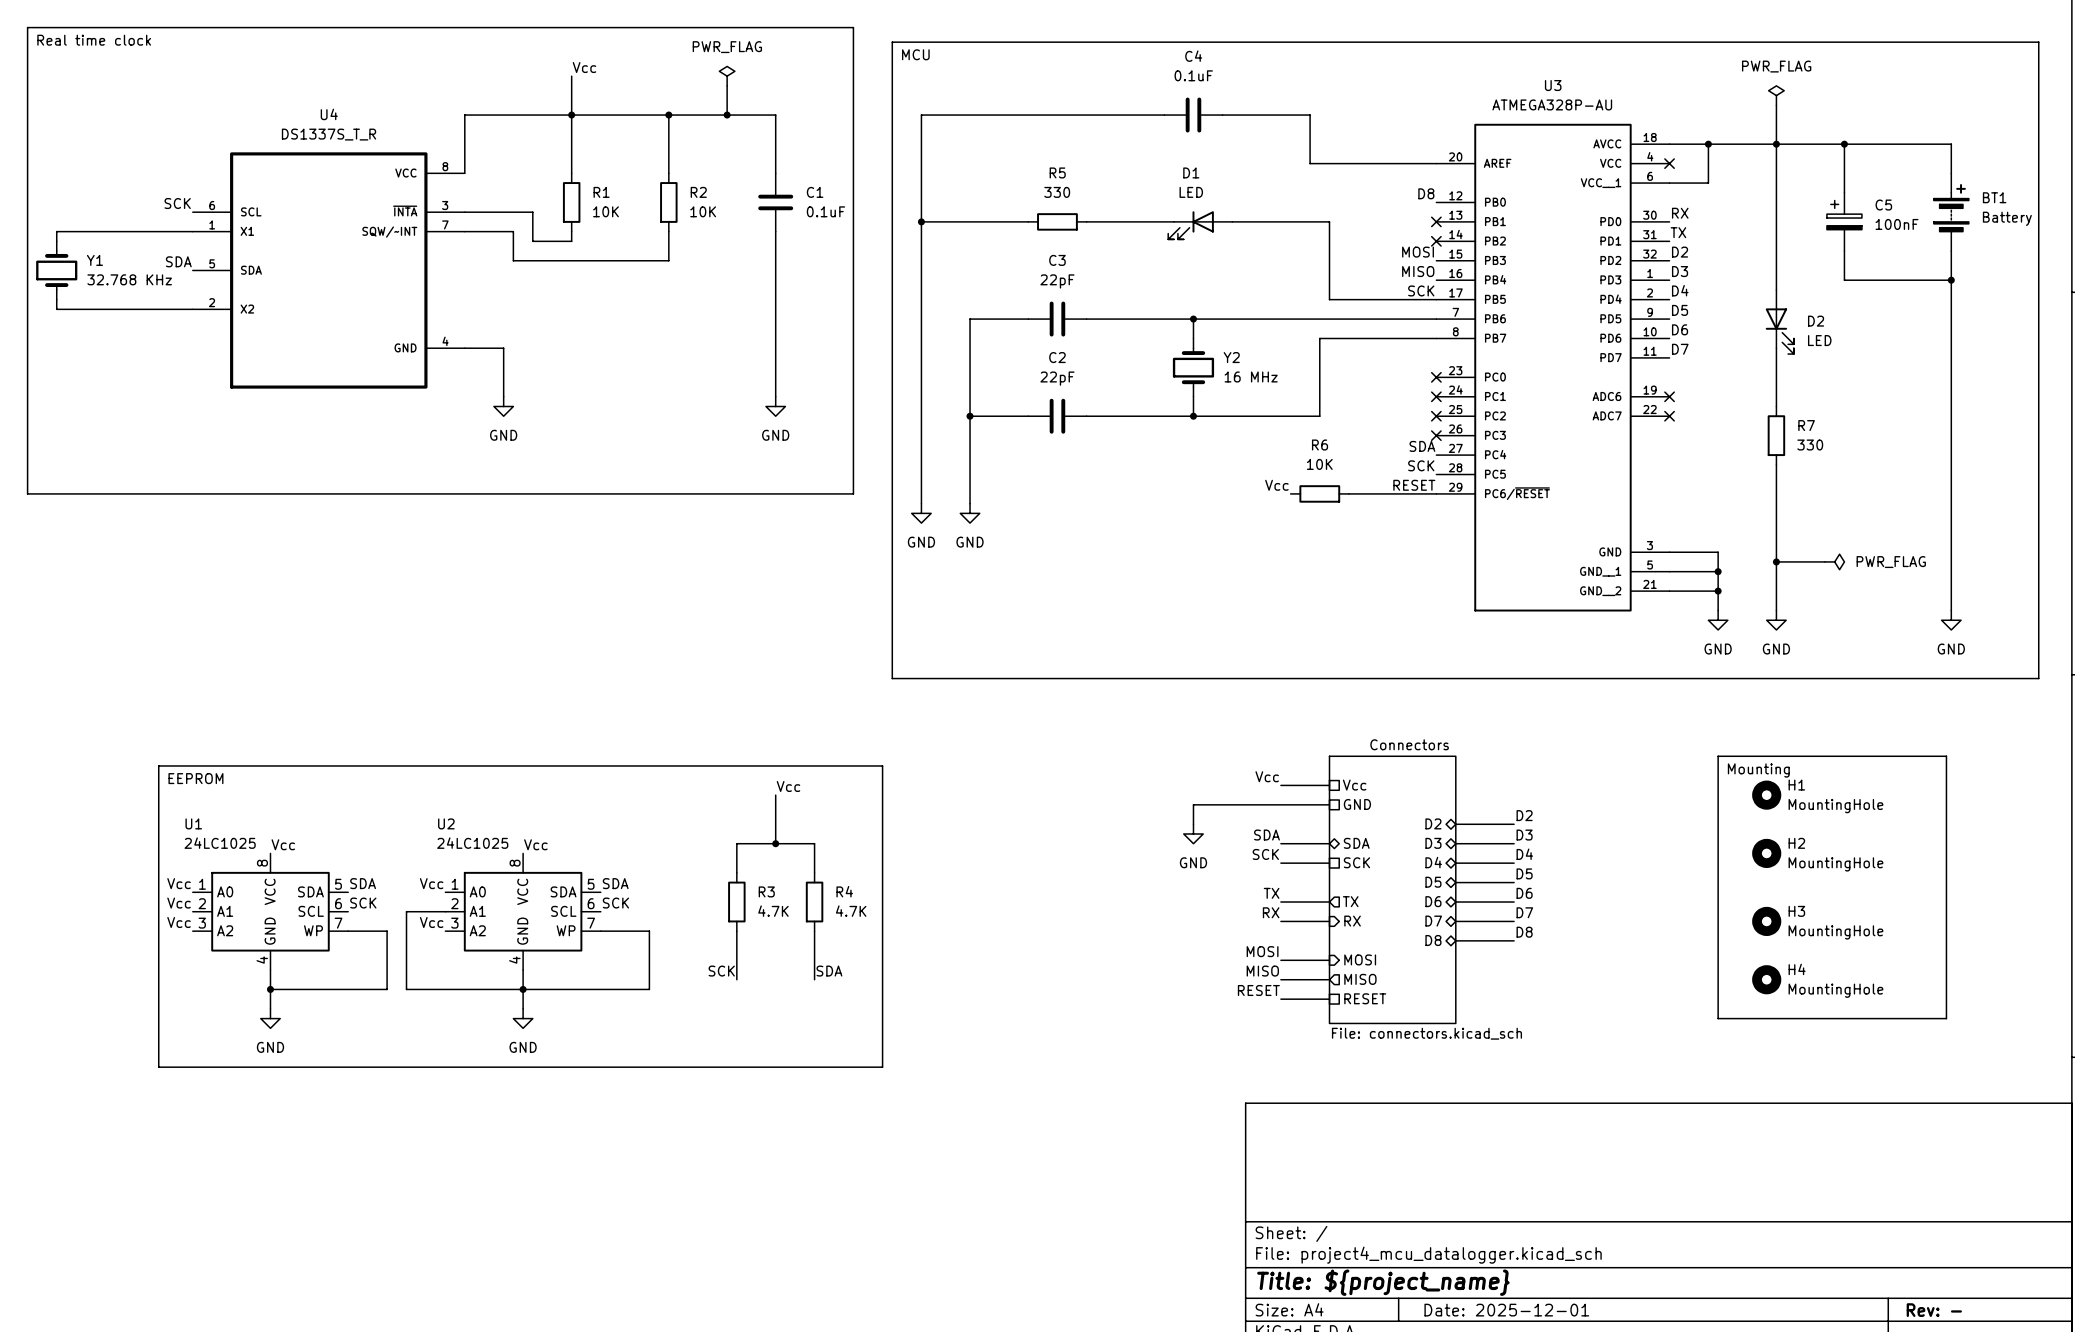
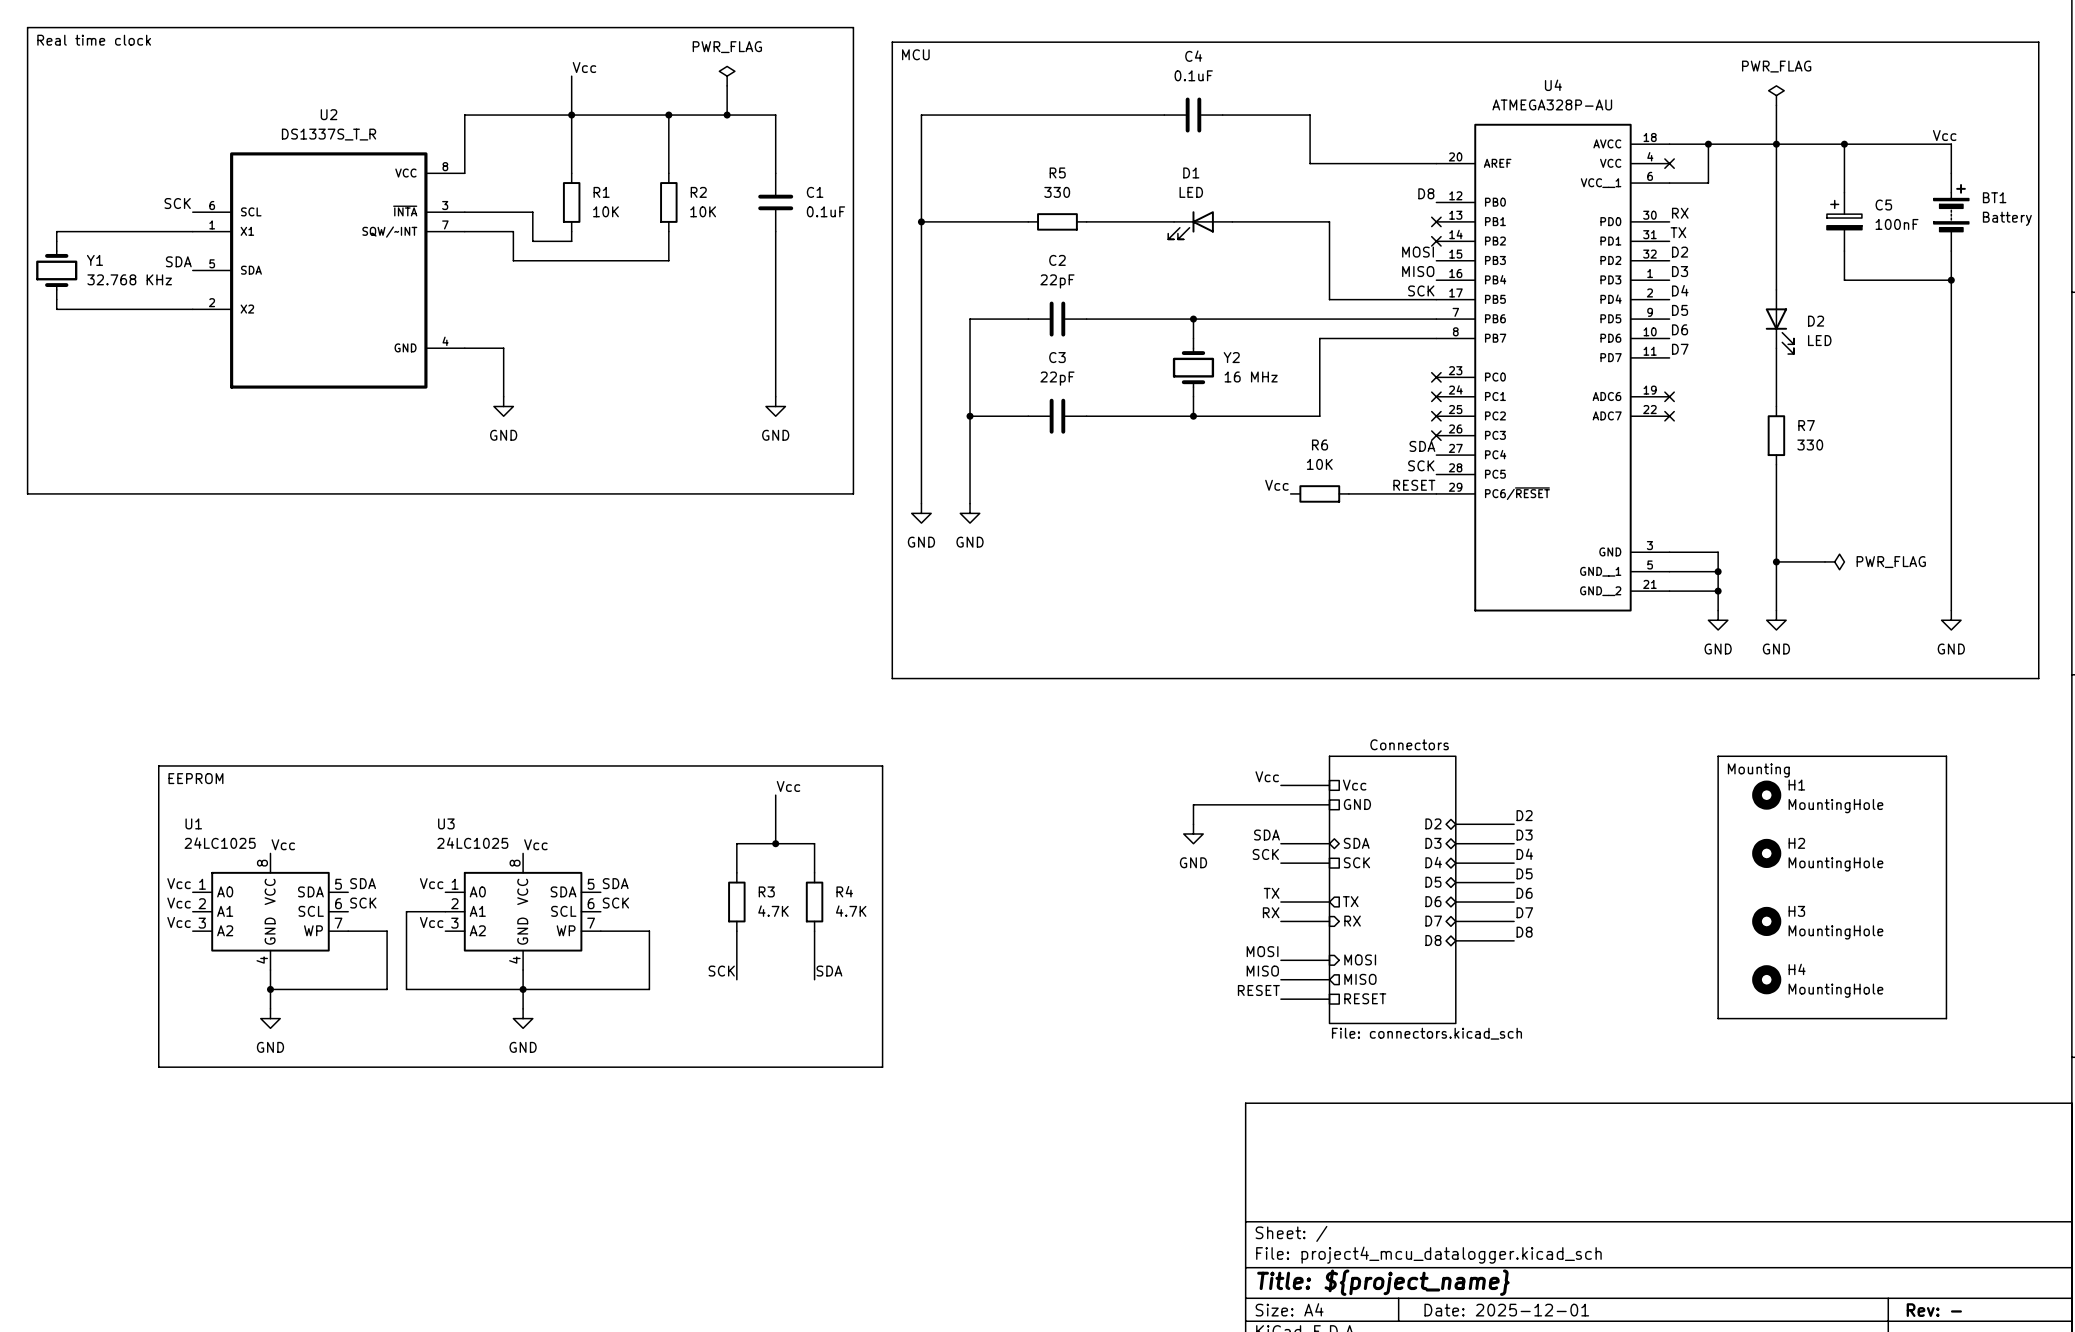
U3 name: U3 (1553, 85) -> U4 (1553, 85)
U4 name: U4 (329, 114) -> U2 (329, 114)
label: none -> Vcc (1944, 135)
C3 name: C3 (1057, 260) -> C2 (1057, 260)
C2 name: C2 (1057, 357) -> C3 (1057, 357)
U2 name: U2 (446, 823) -> U3 (446, 823)

